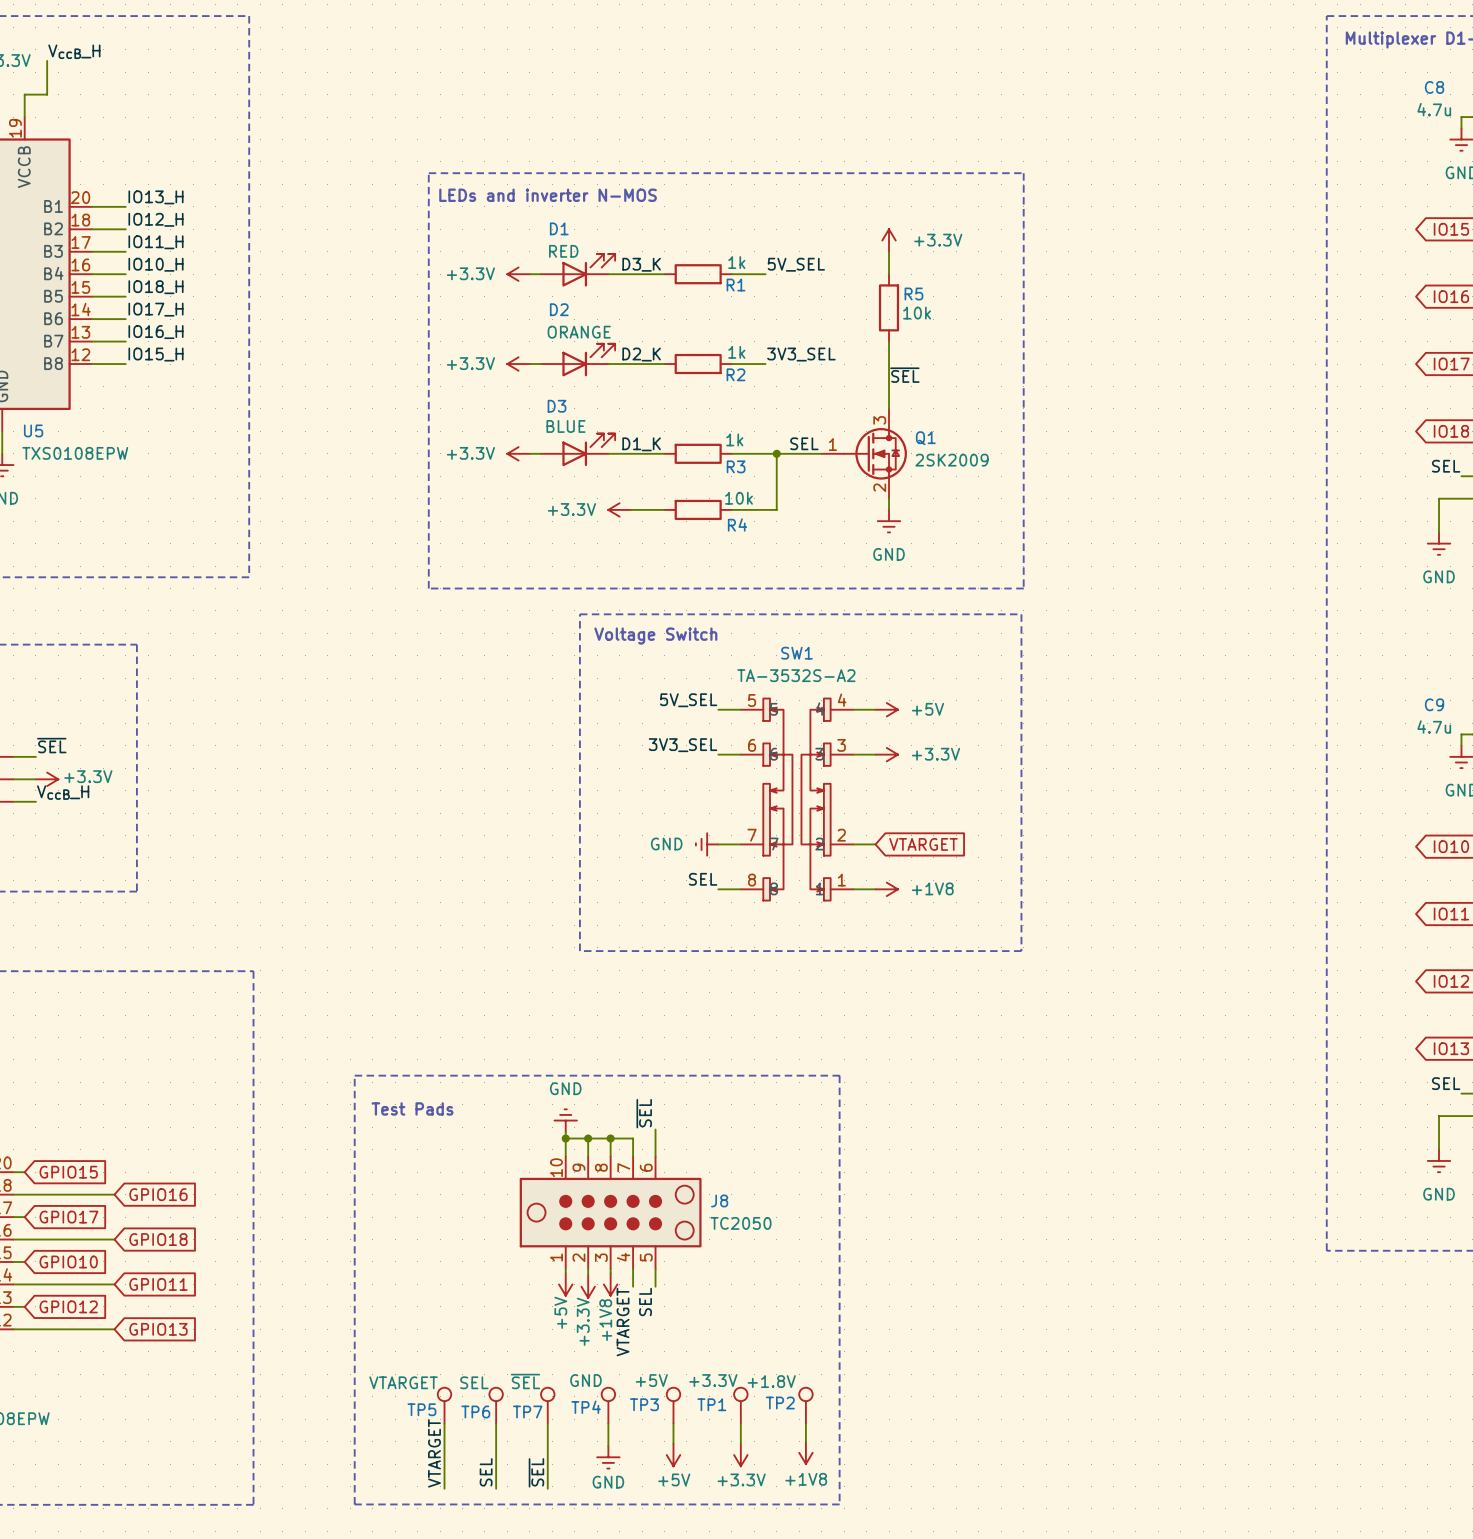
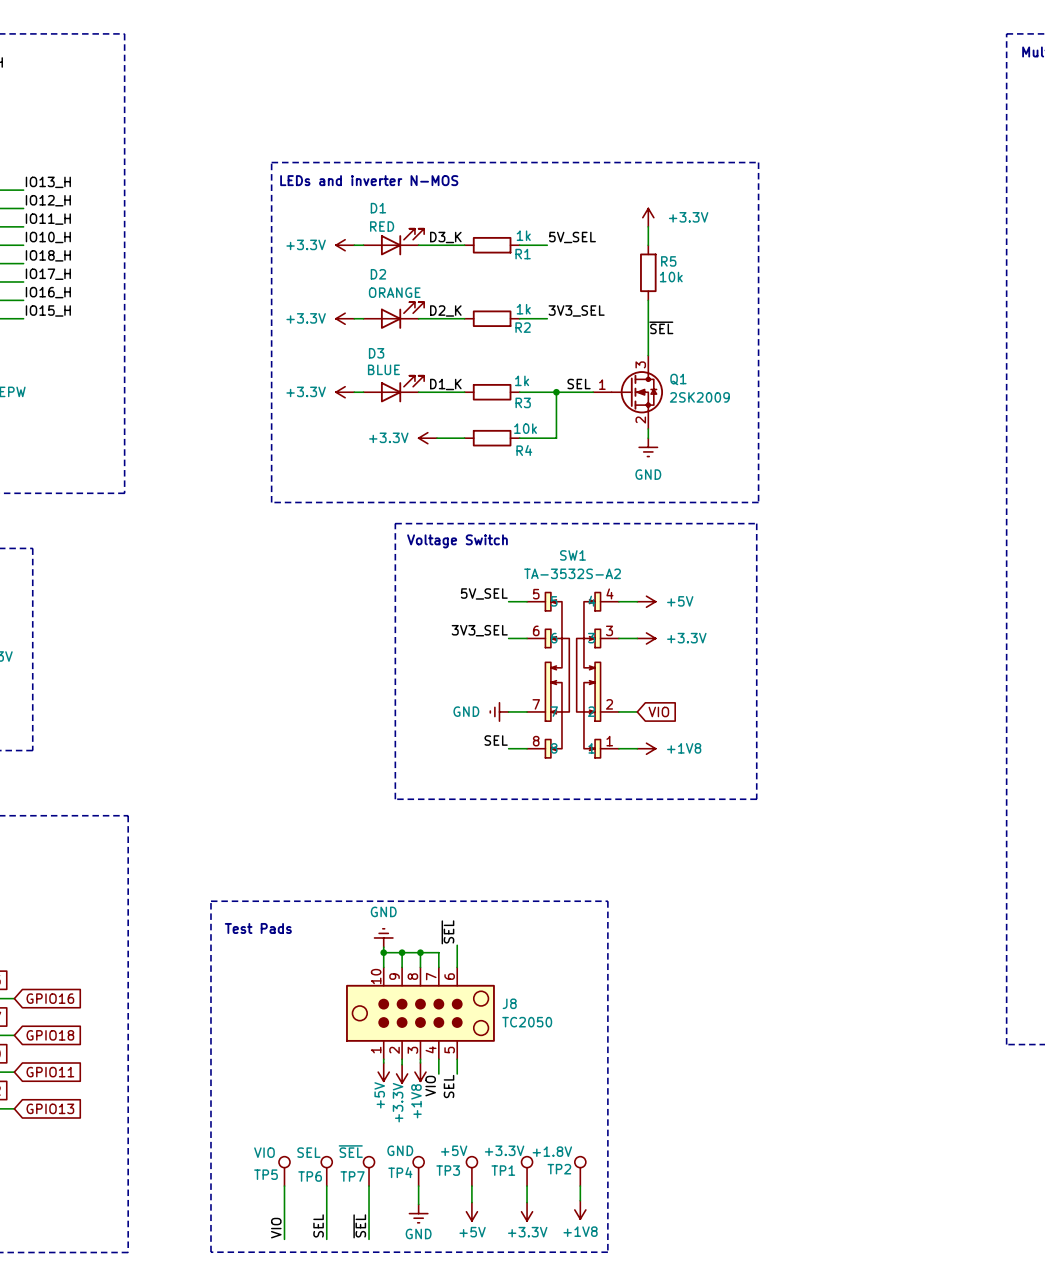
global label: VTARGET (923, 844) -> VIO (658, 711)
label: VTARGET (623, 1322) -> VIO (430, 1086)
TP5 value: VTARGET (403, 1382) -> VIO (264, 1152)
label: VTARGET (434, 1453) -> VIO (276, 1228)

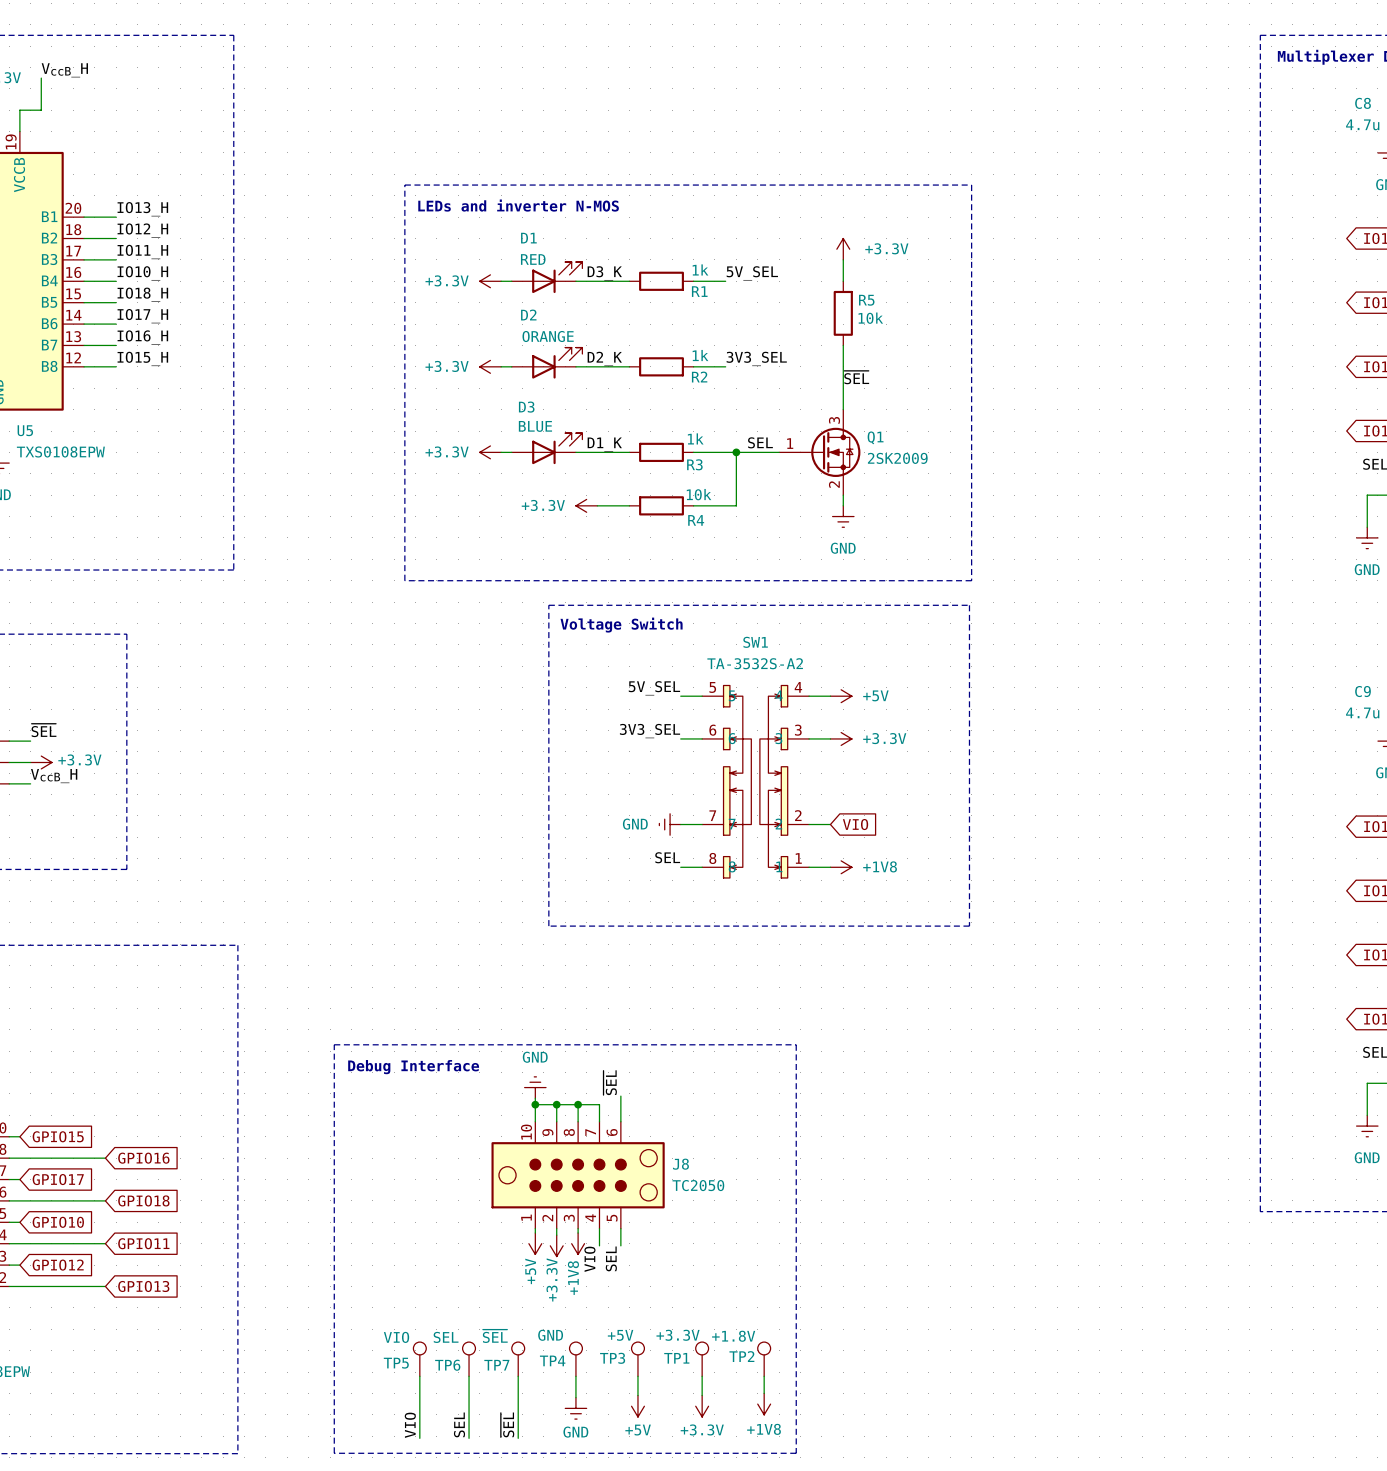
text: none -> Debug Interface (413, 1067)
text: Test Pads (258, 928) -> none

